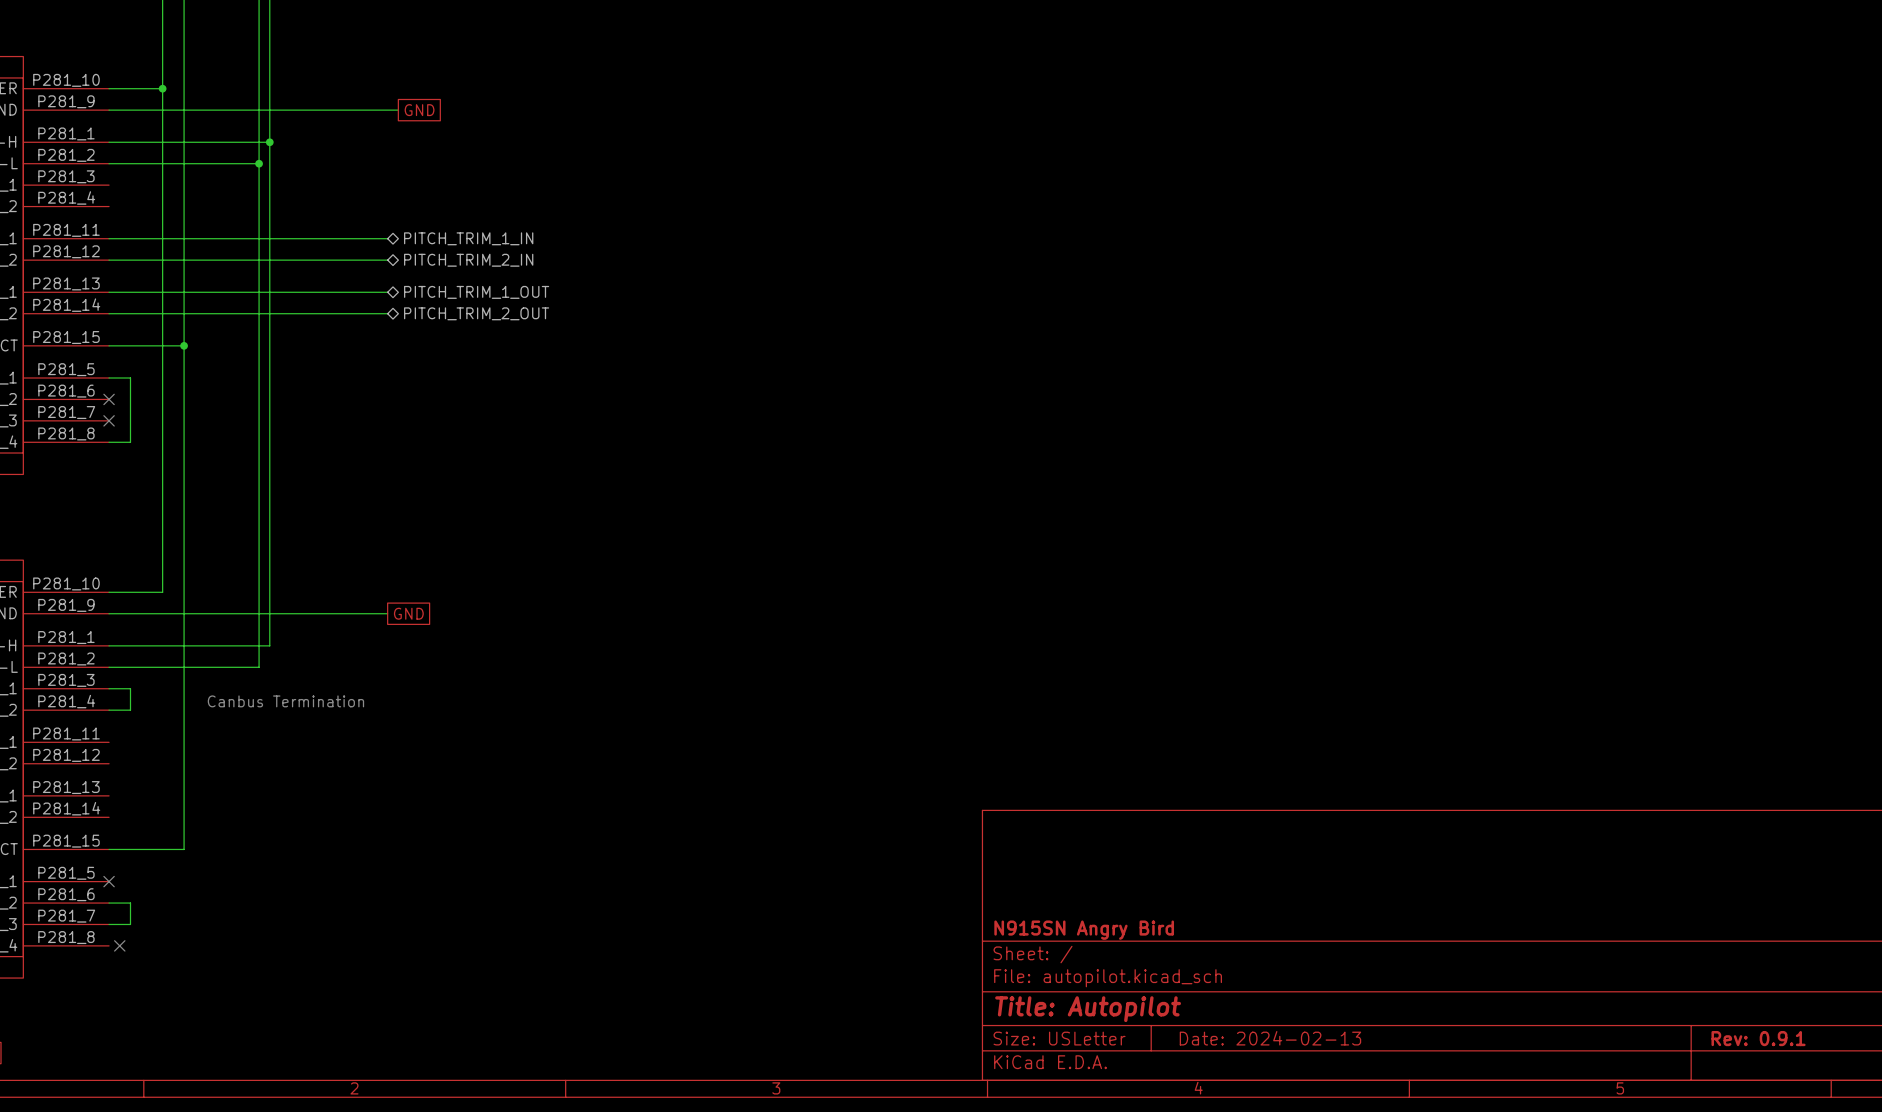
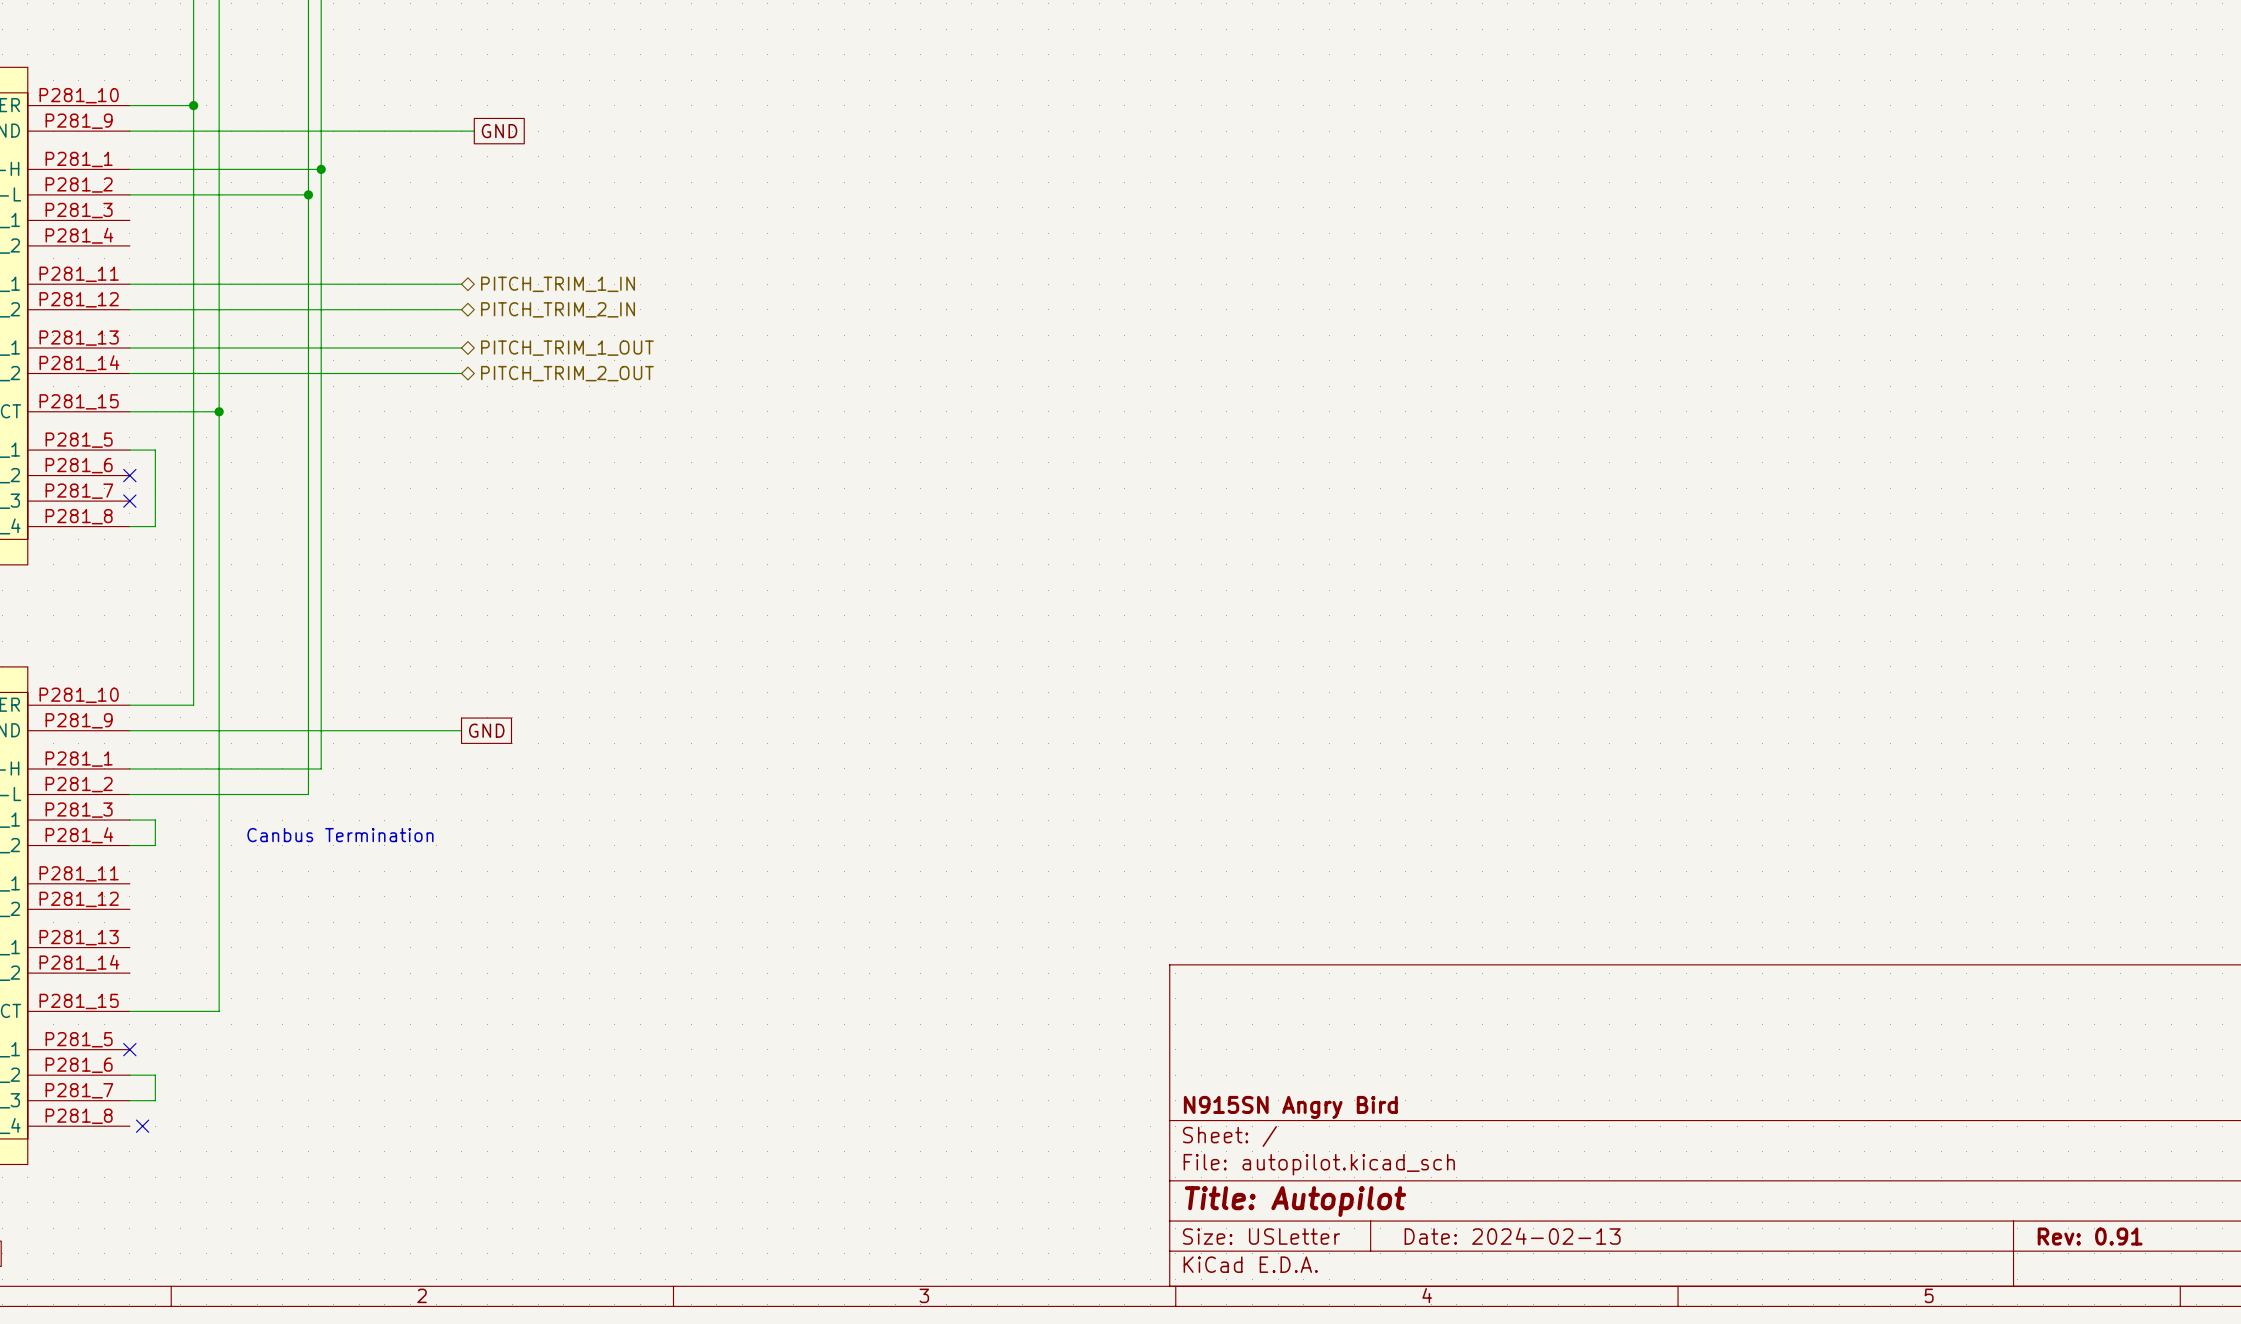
title block: Rev: 0.9.1 (1758, 1038) -> Rev: 0.91 (2090, 1236)

